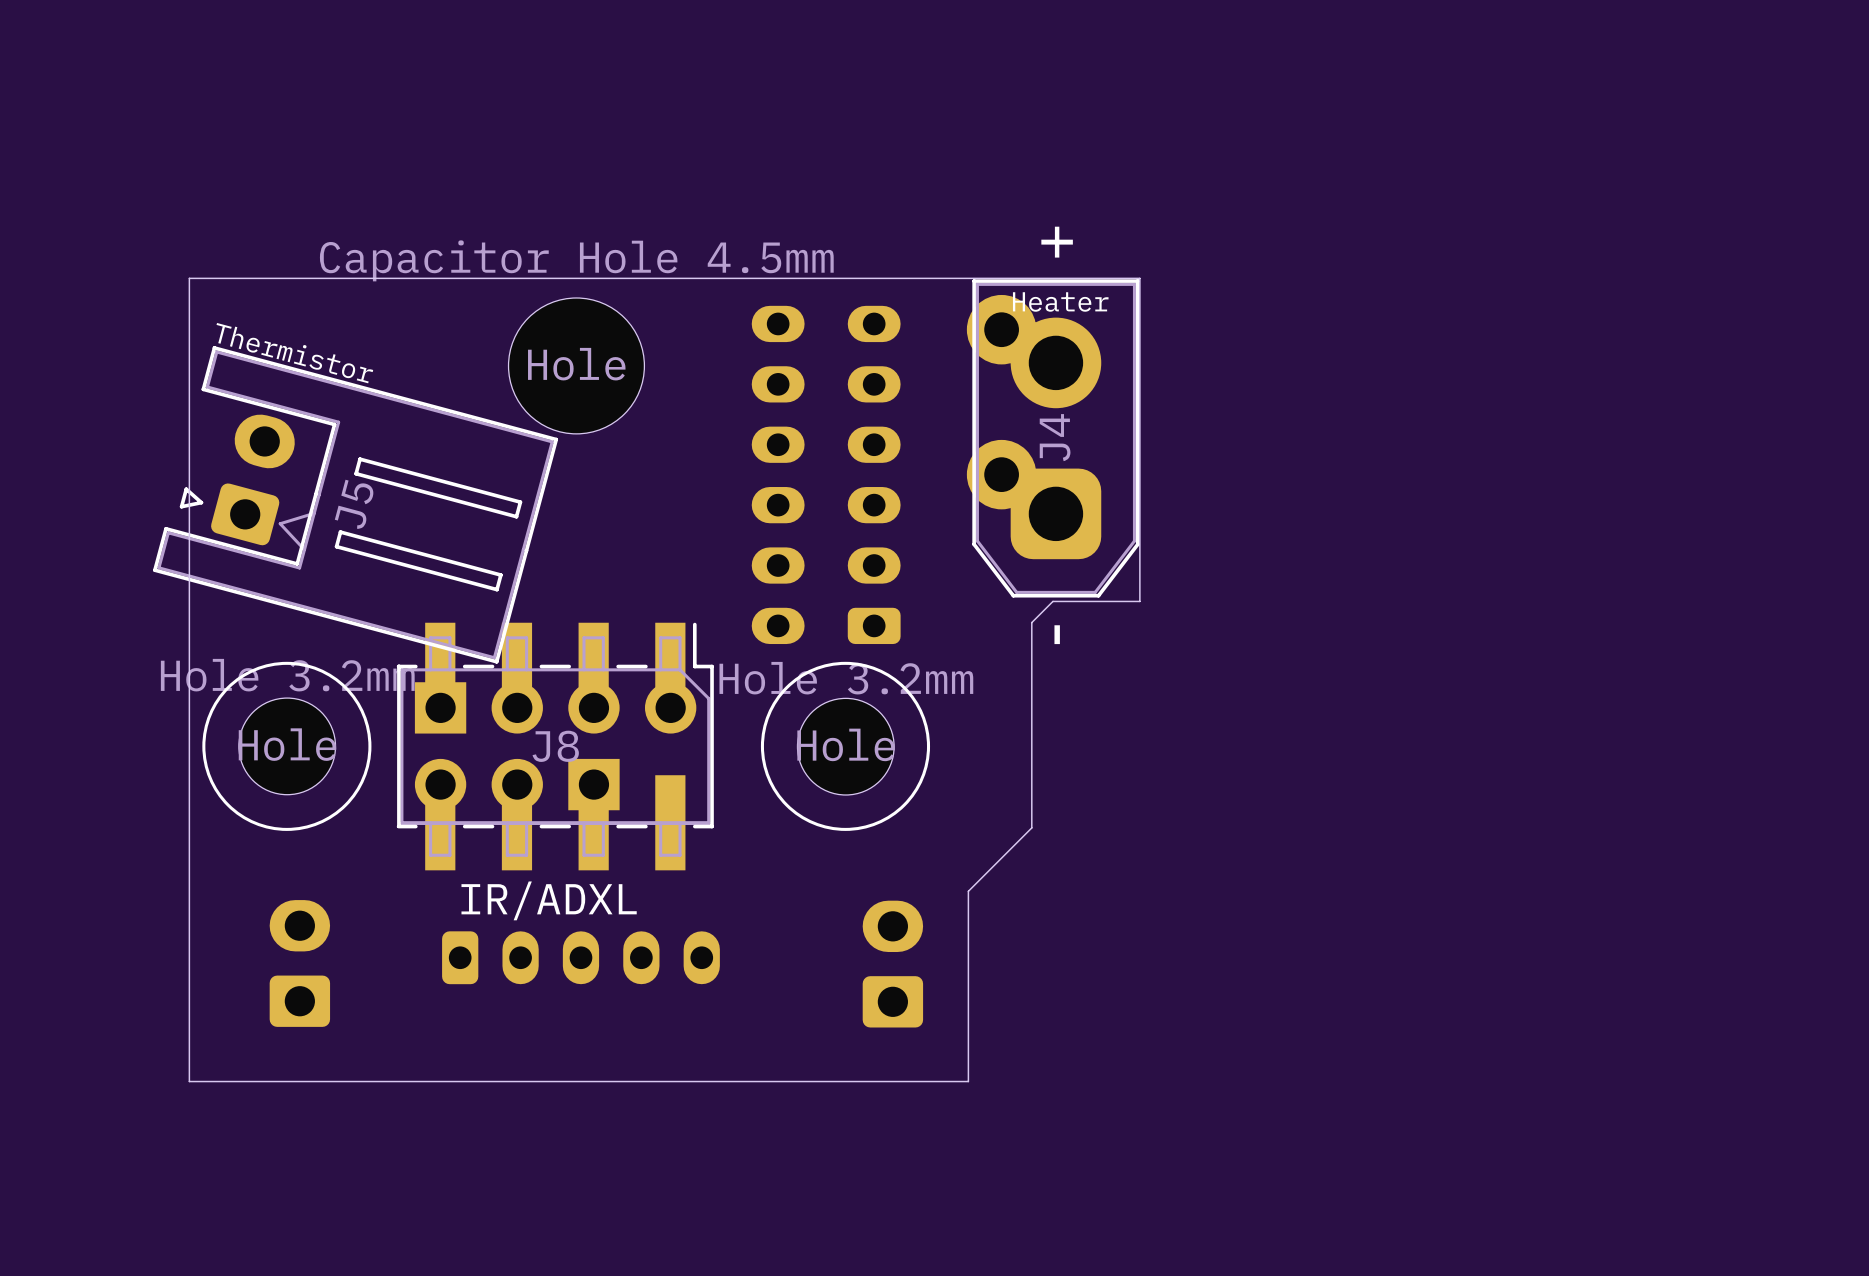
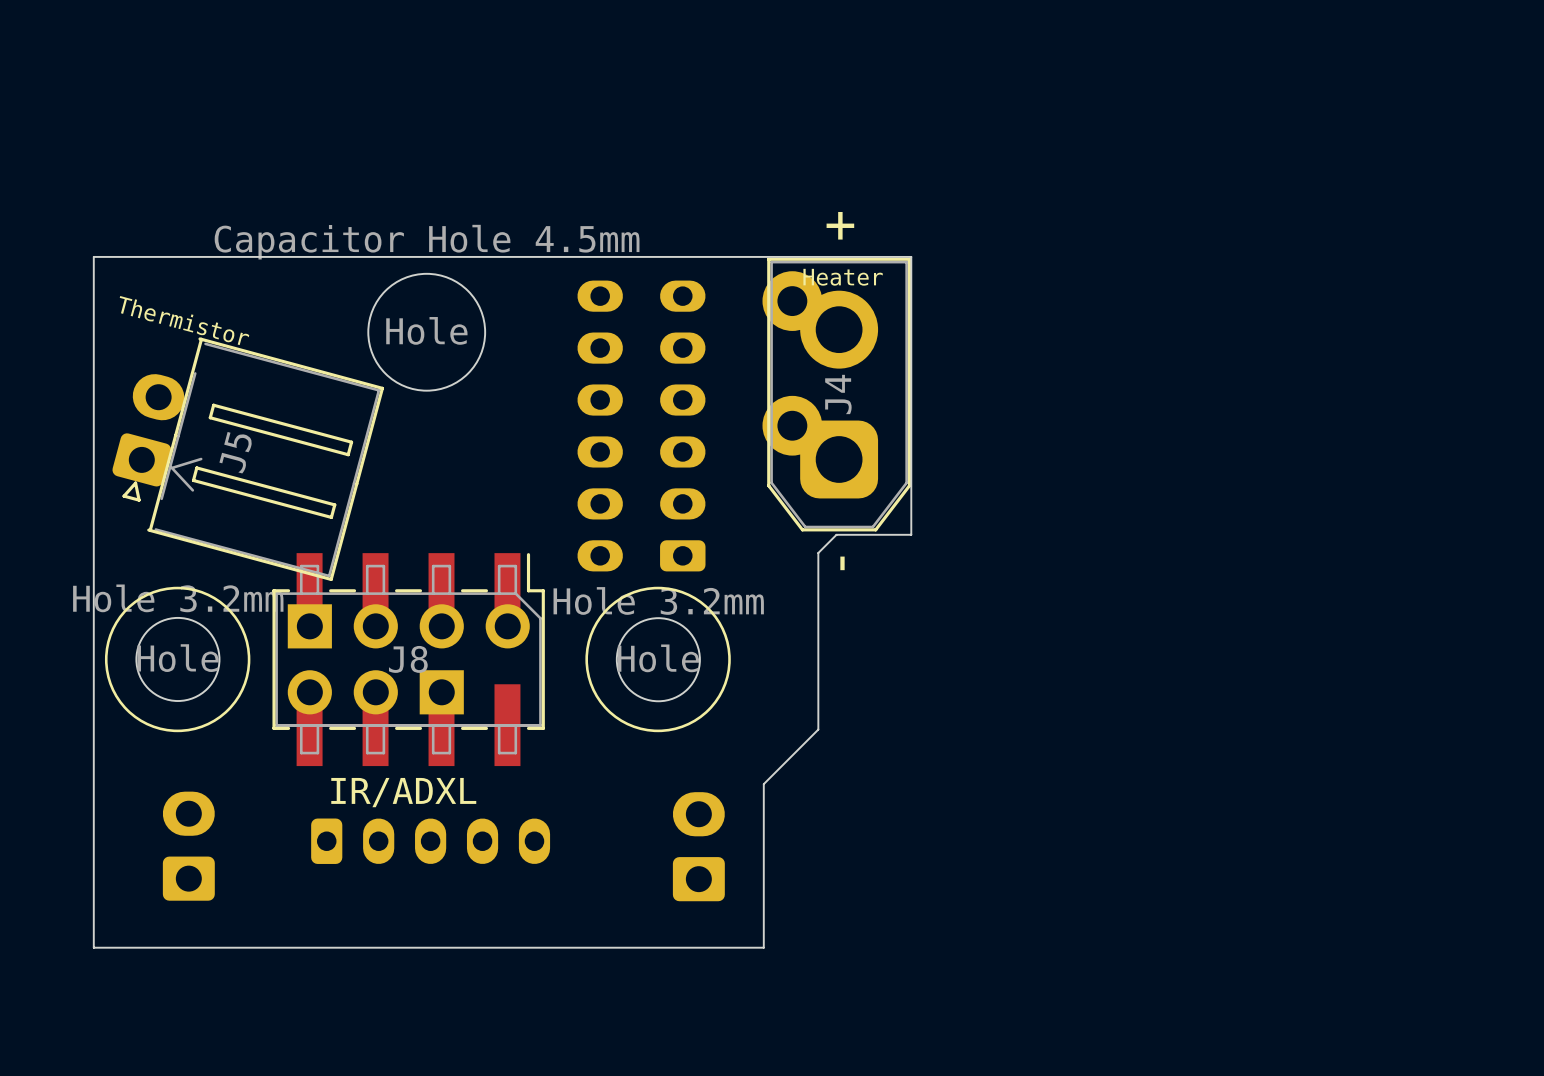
J5 footprint: [153, 346, 559, 664] -> [112, 337, 384, 582]

